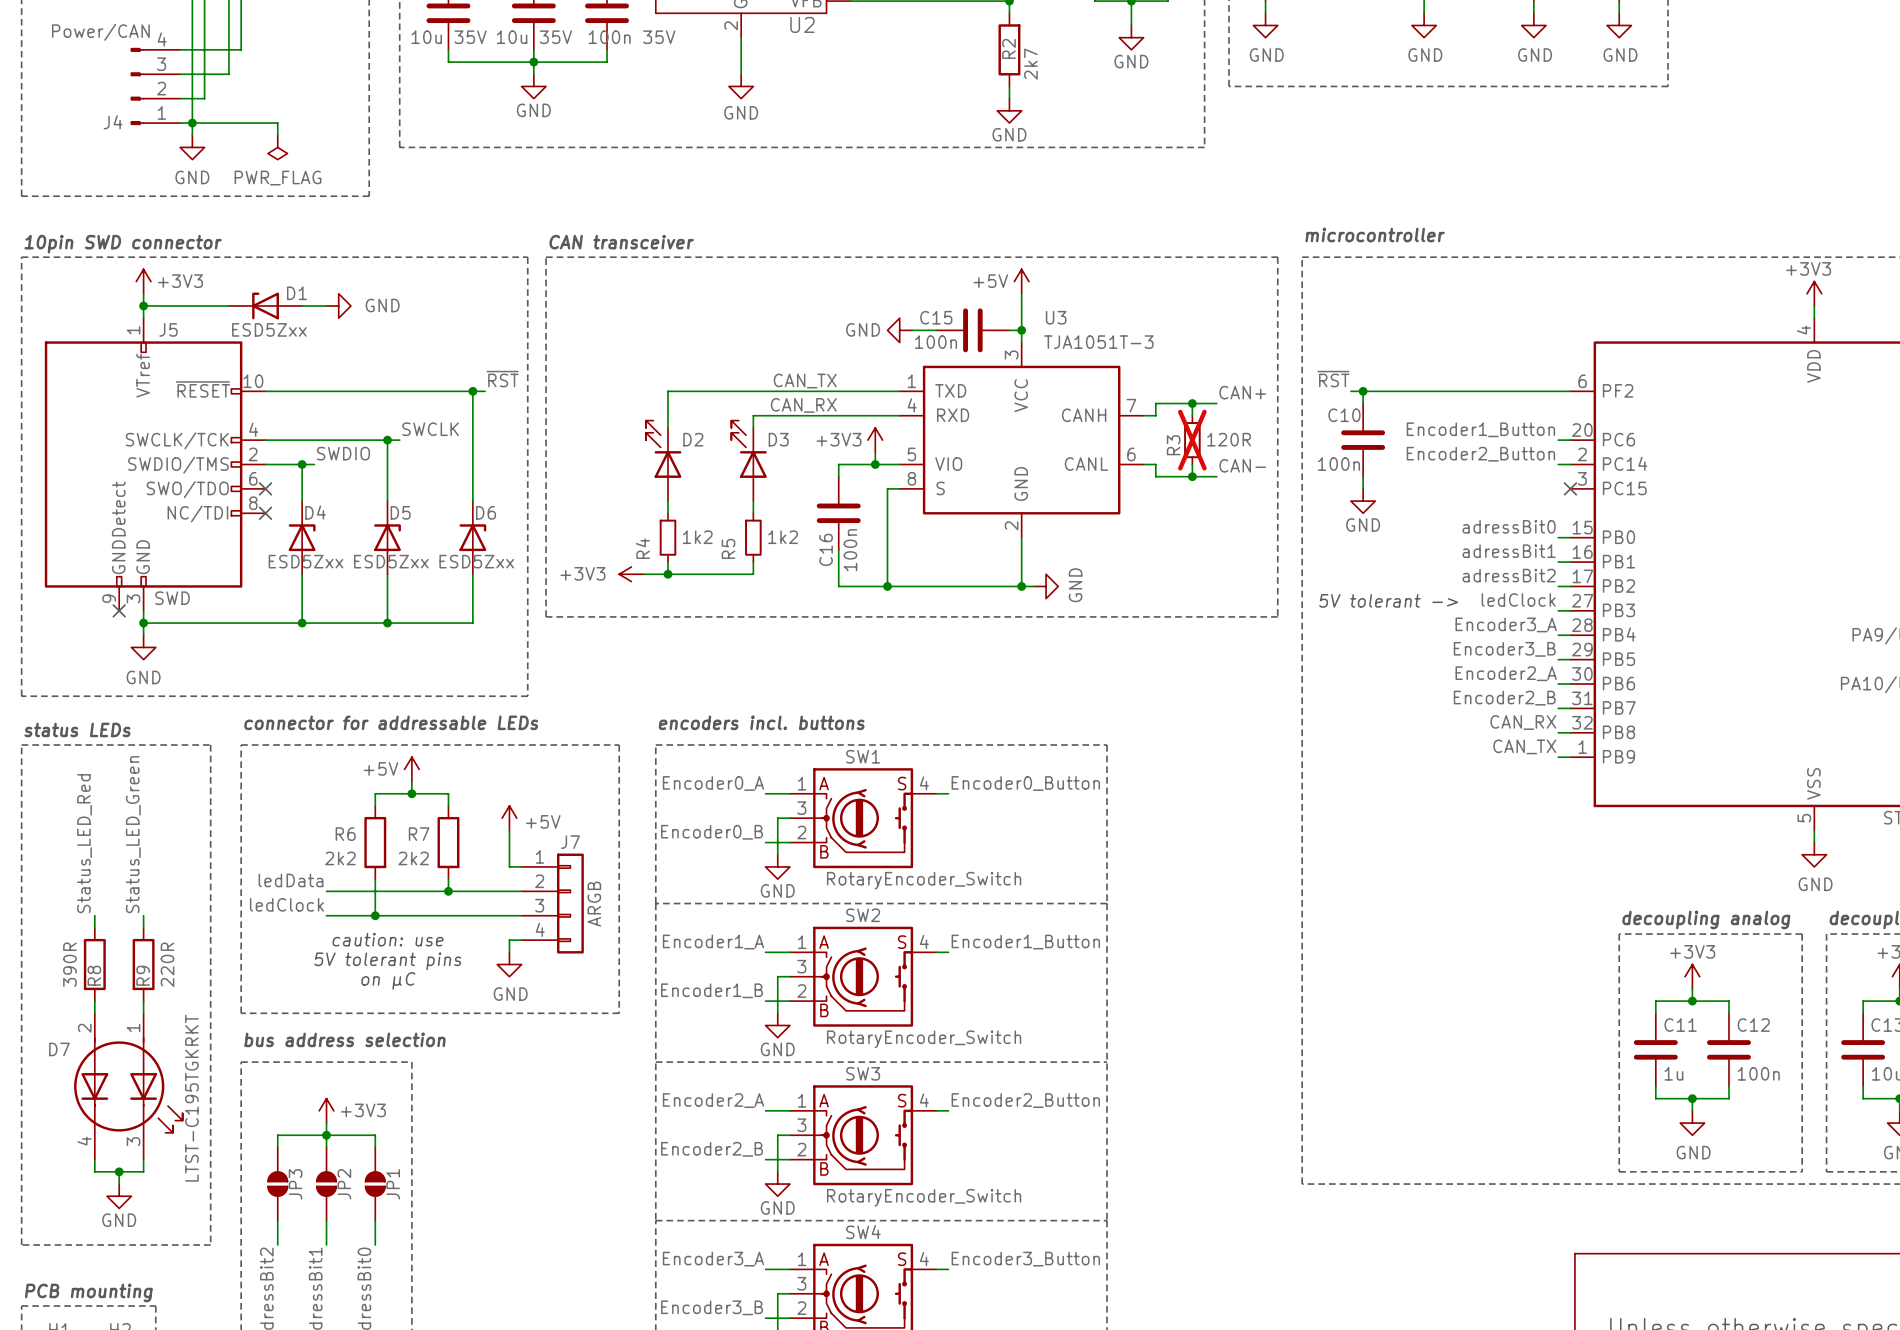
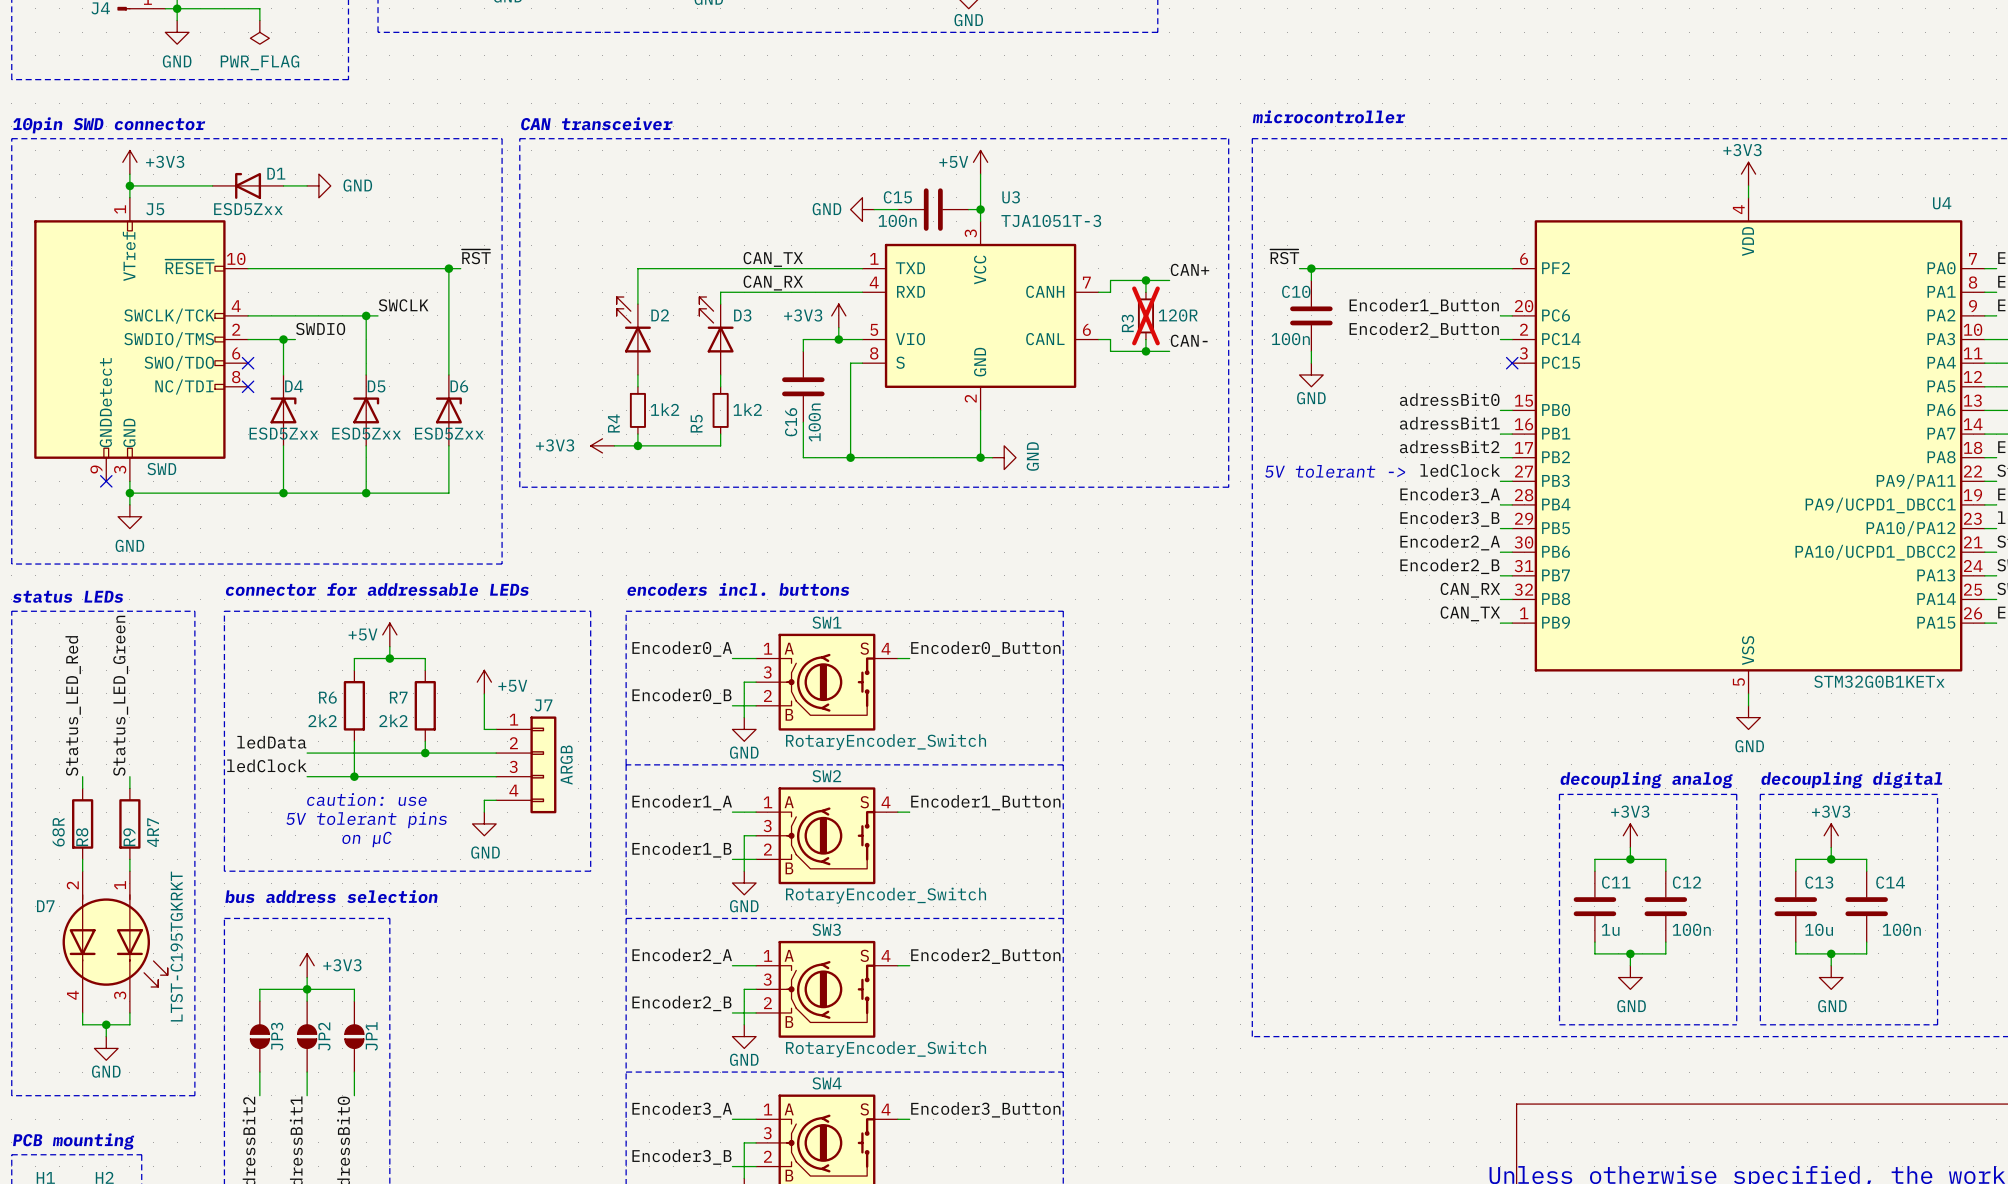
R8 value: 390R (69, 964) -> 68R (58, 832)
R9 value: 220R (167, 964) -> 4R7 (153, 832)

